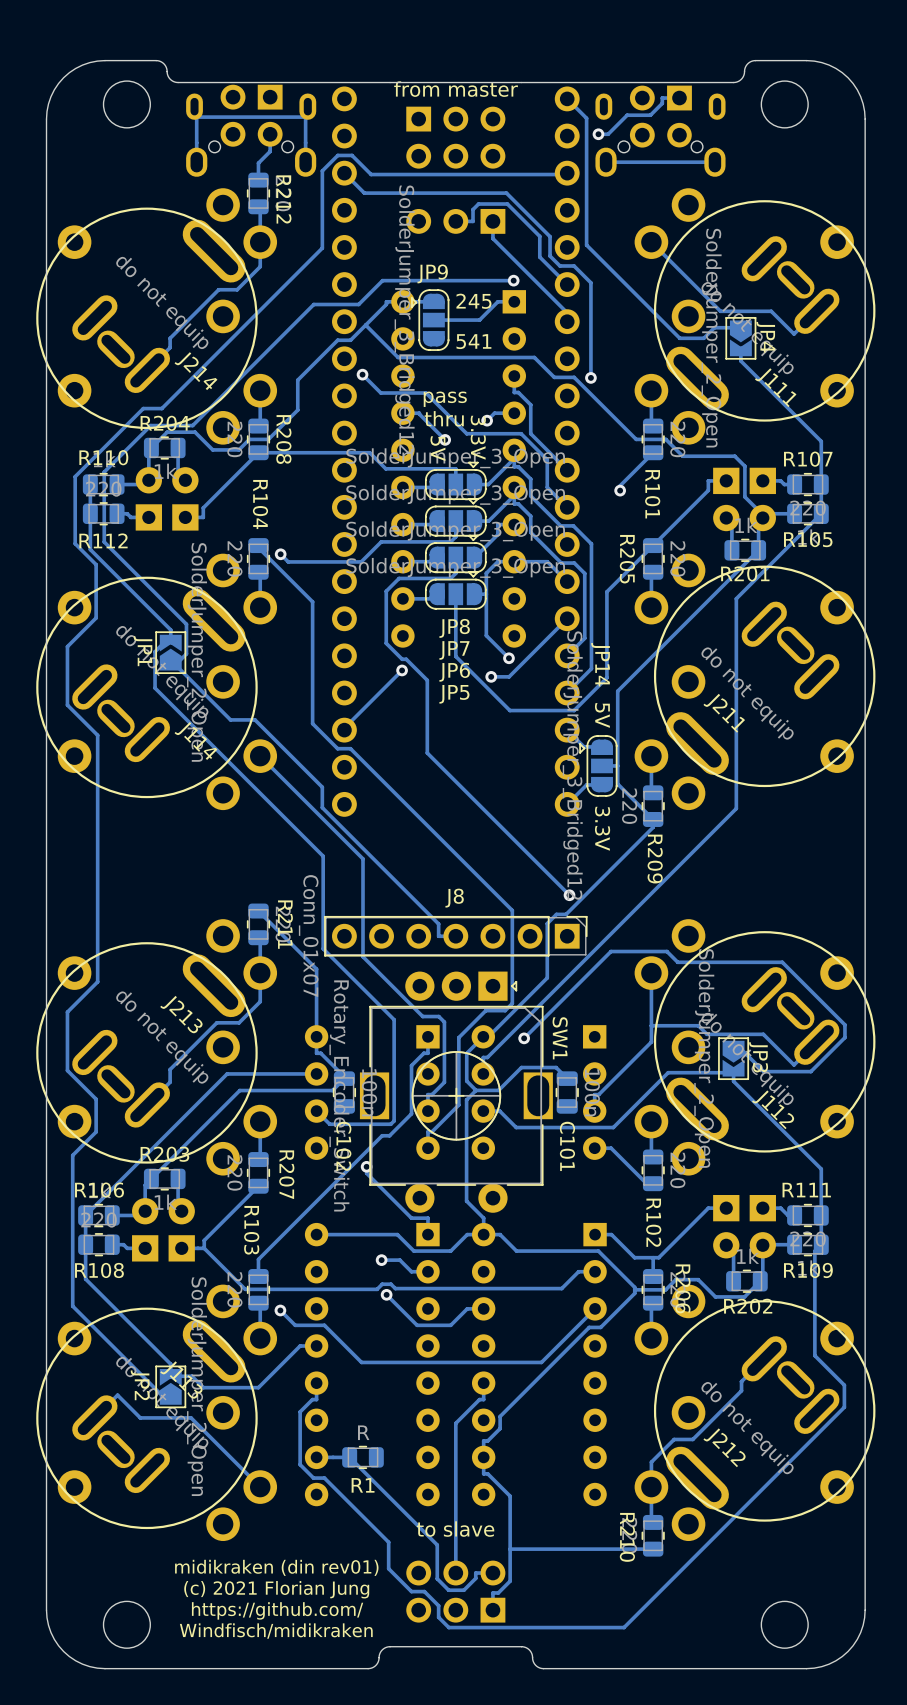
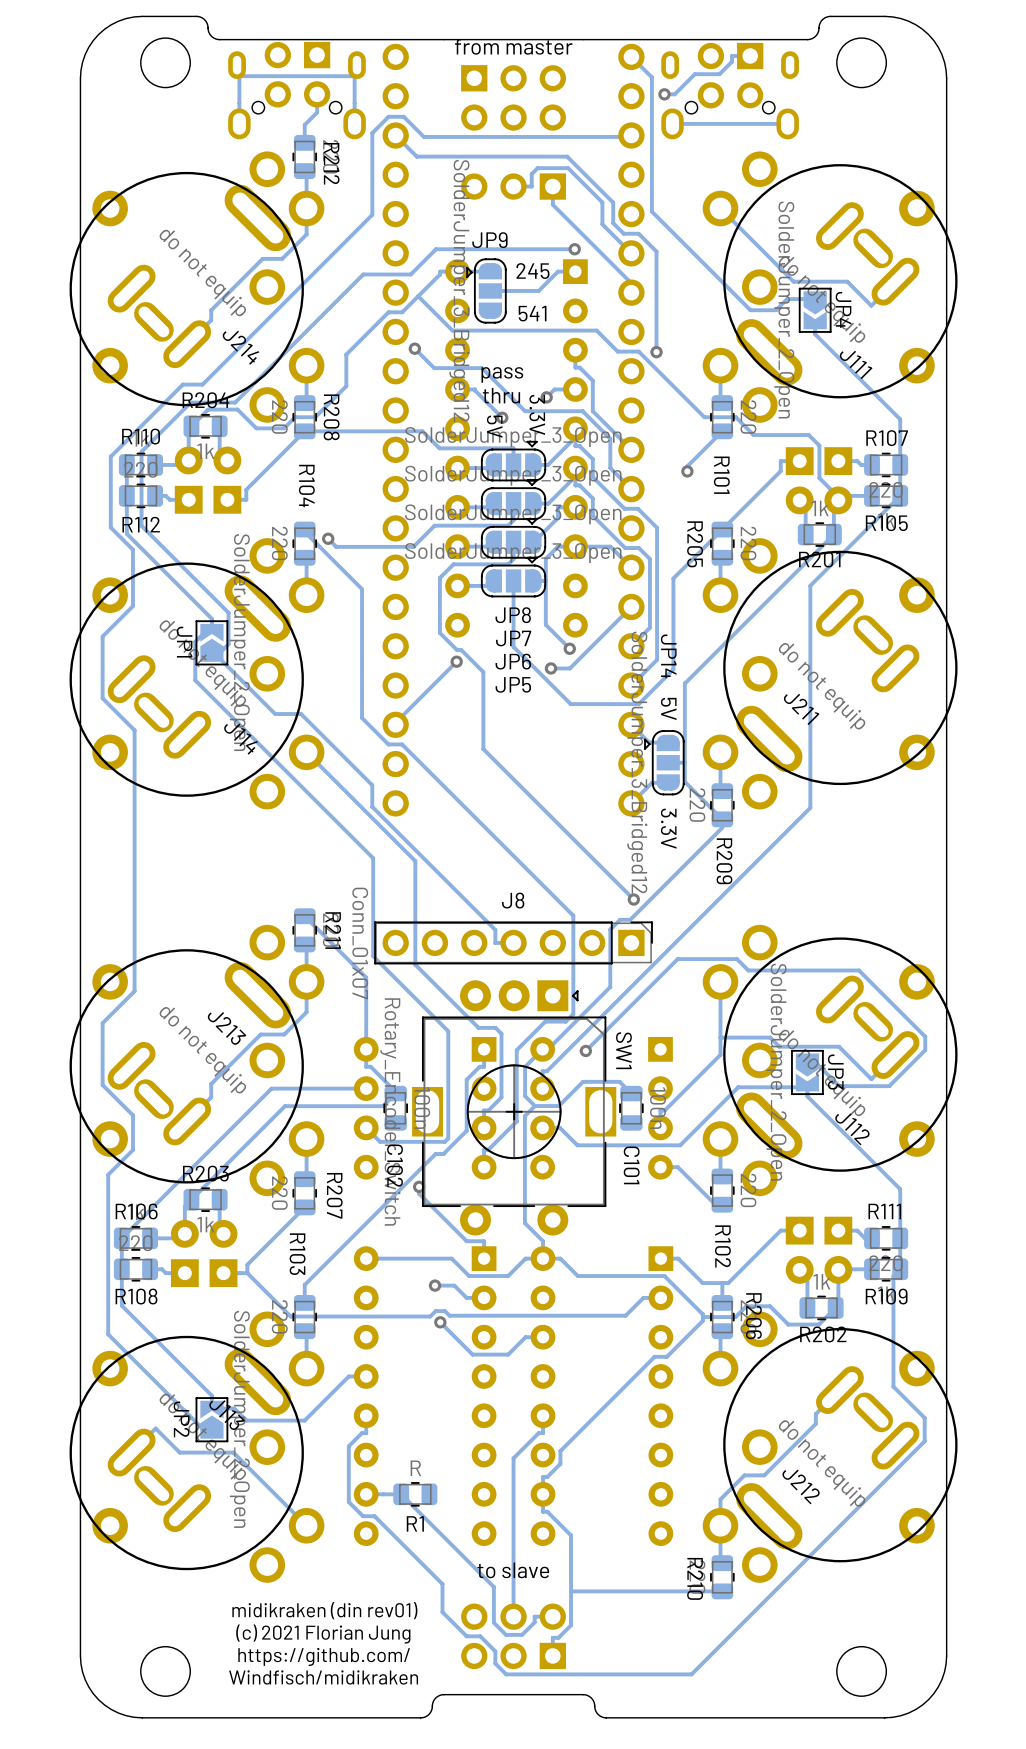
track: (595, 1308) (541, 1362) (361, 1362) (324, 1325) (295, 1325) (280, 1310) -> none
via: (280, 1310) -> none

